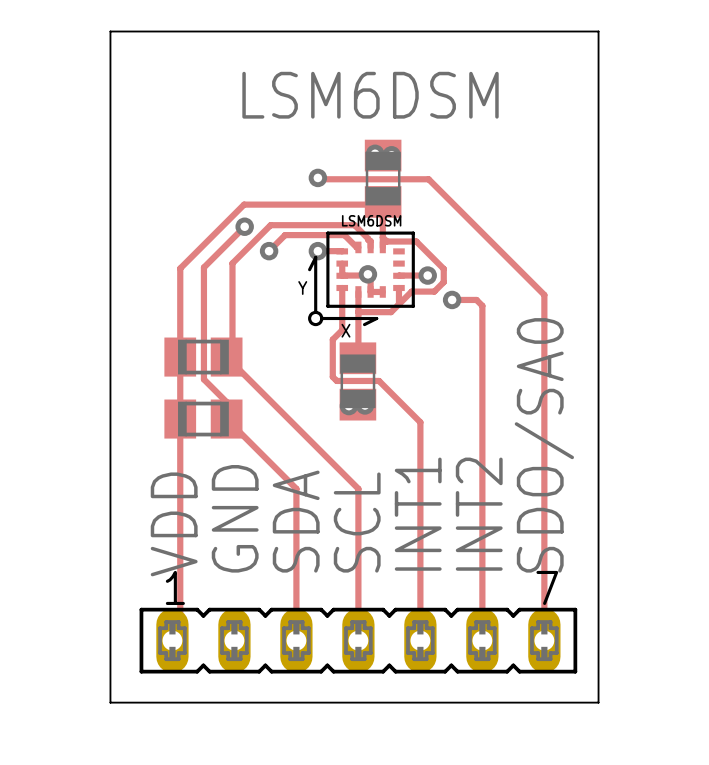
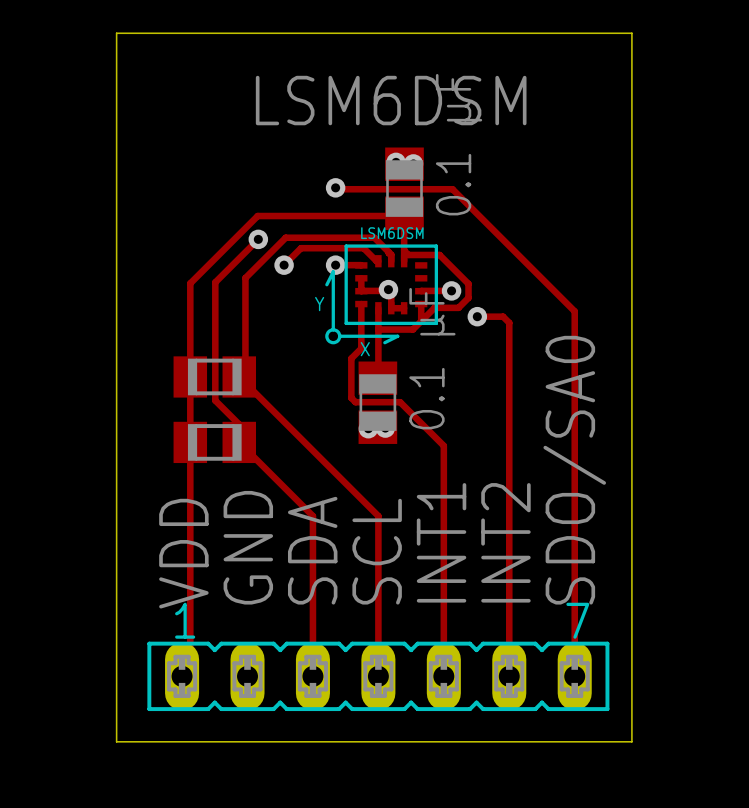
part value: none -> 0.1 μF (459, 144)
part value: none -> 0.1 μF (432, 358)

